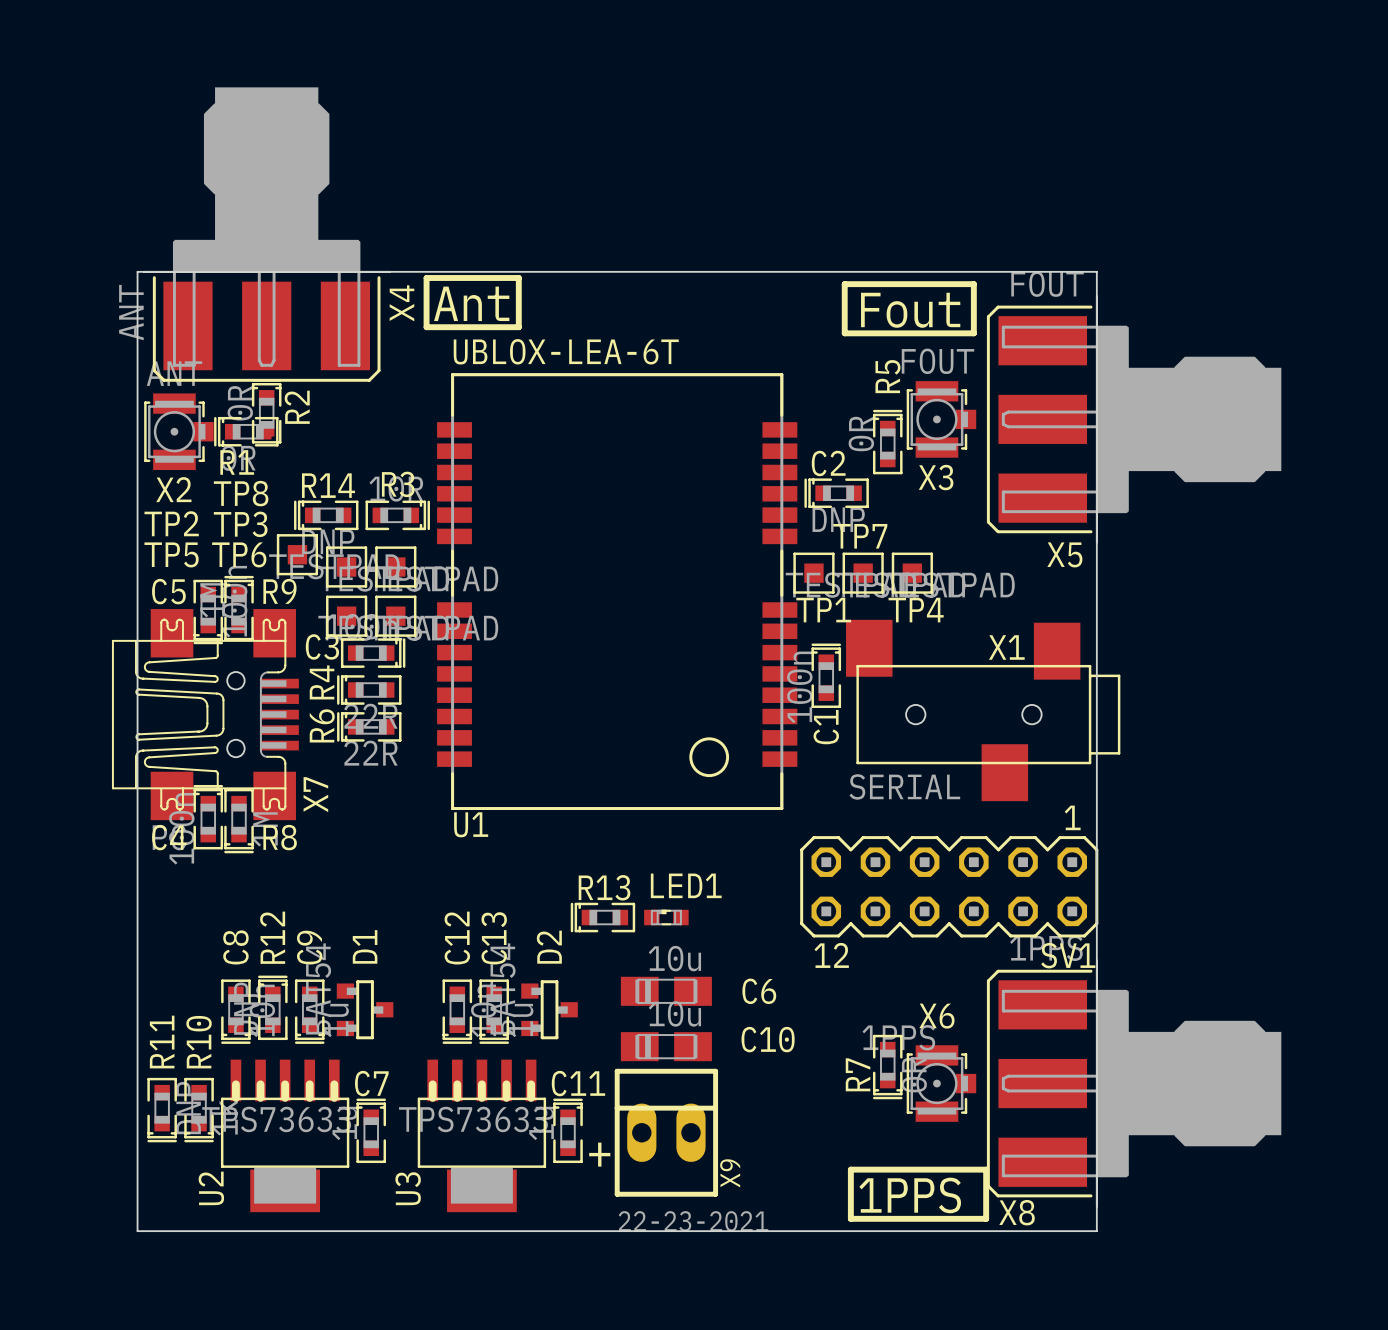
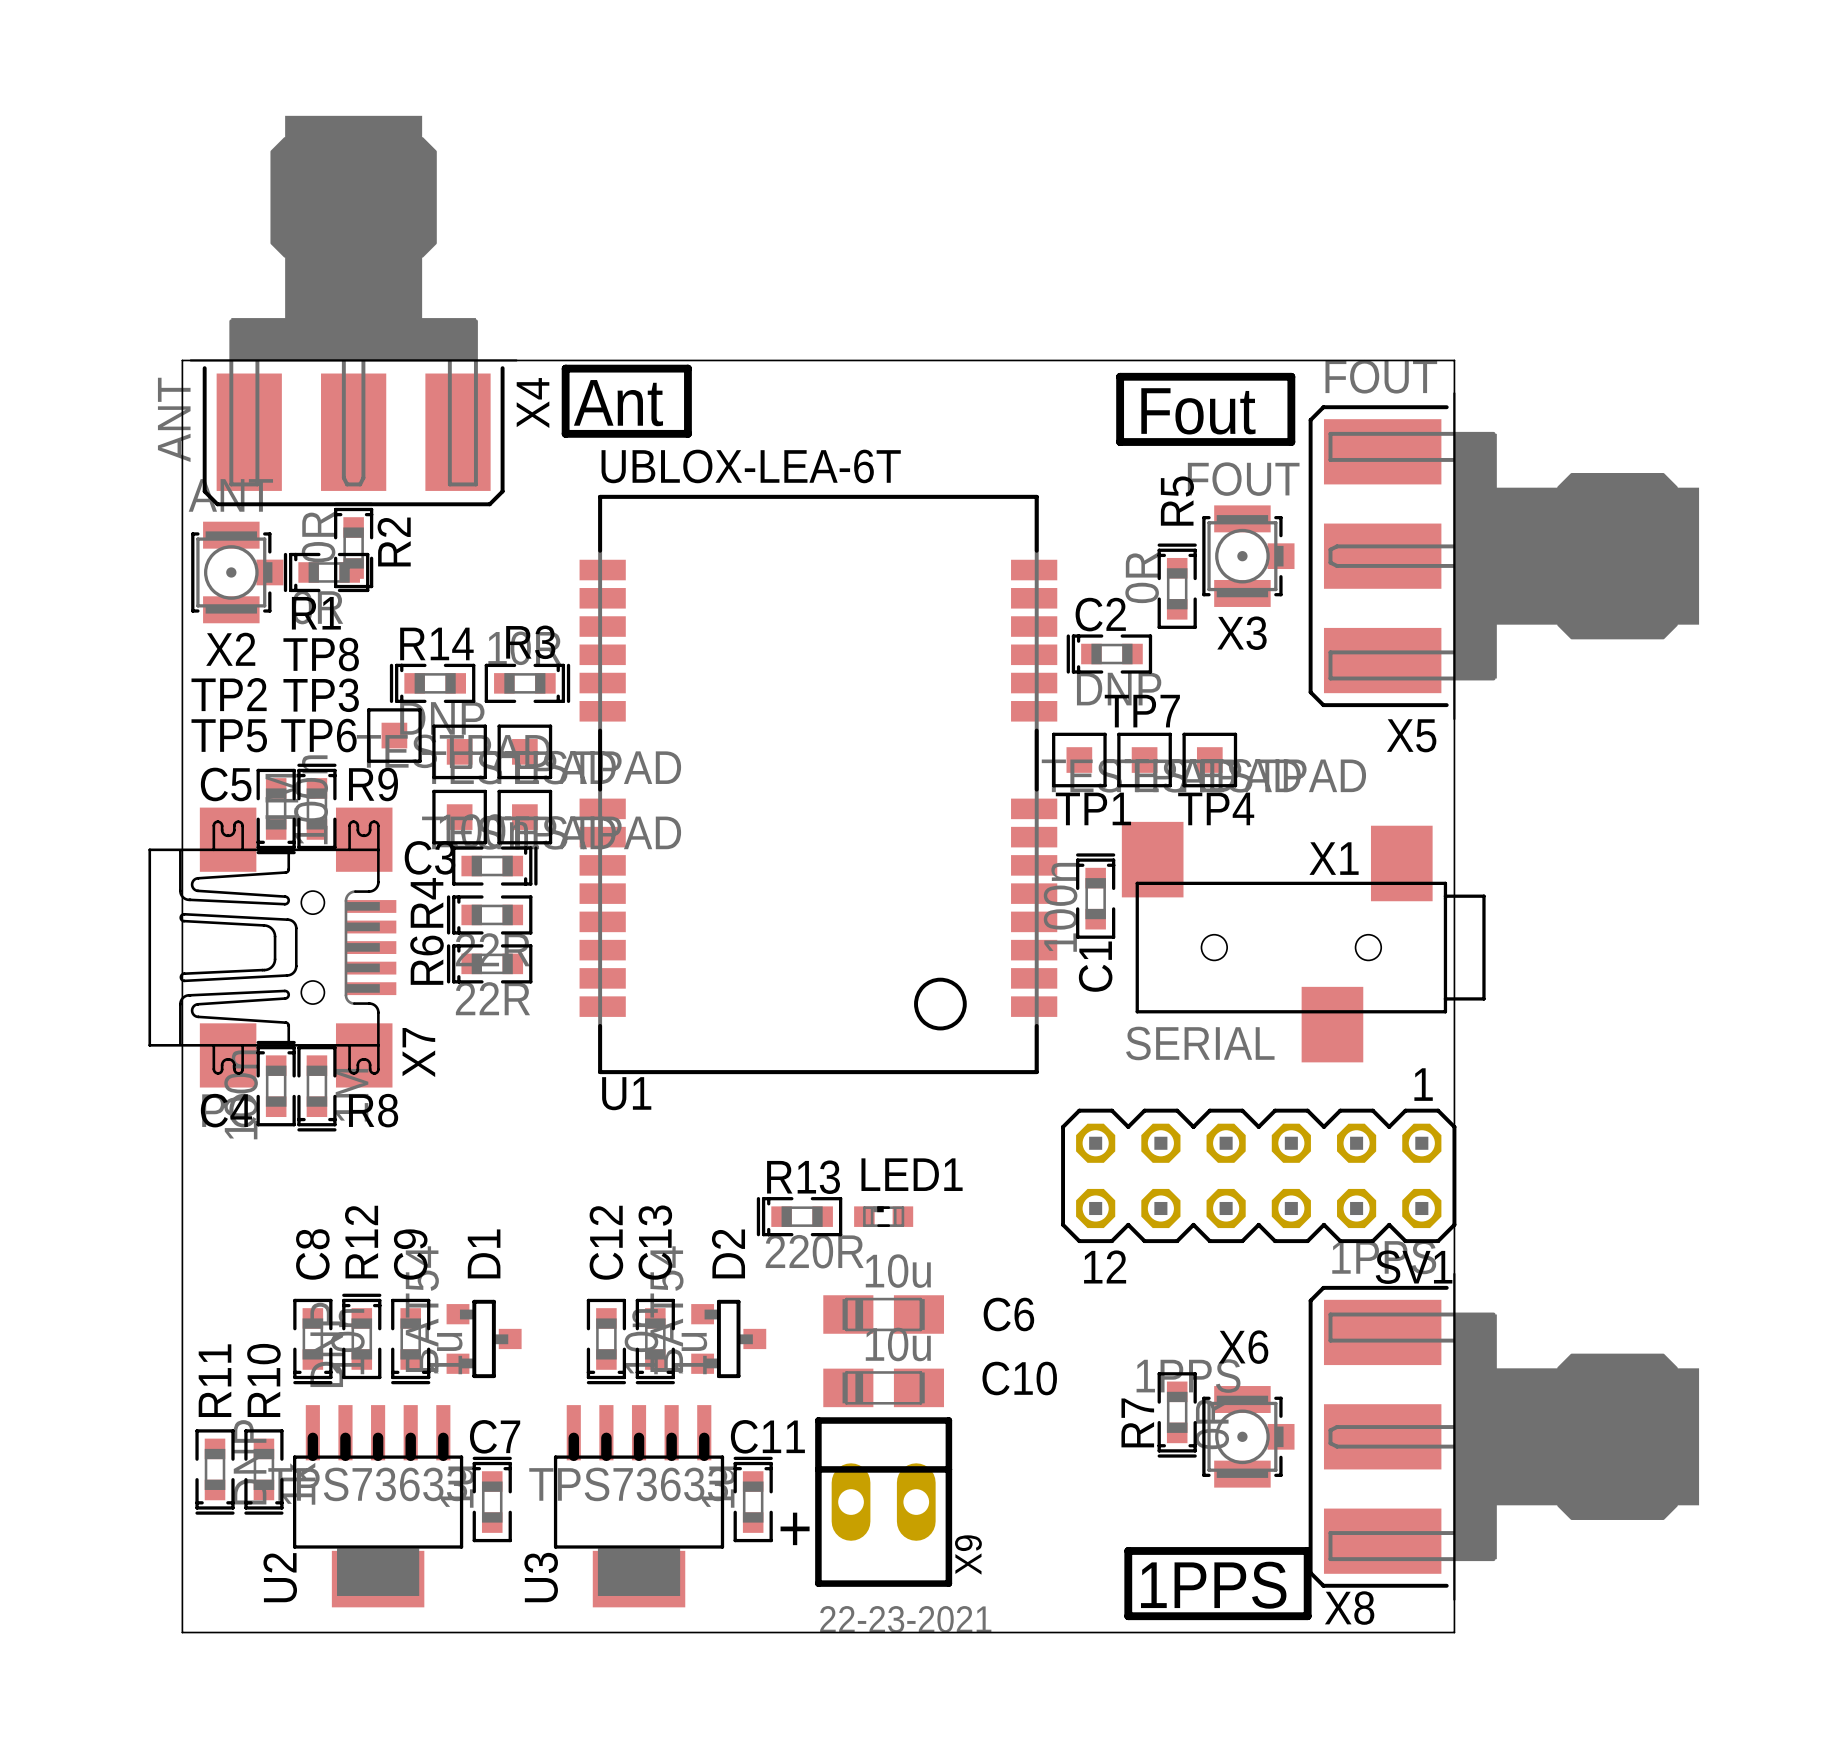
R13 value: none -> 220R (814, 1251)

